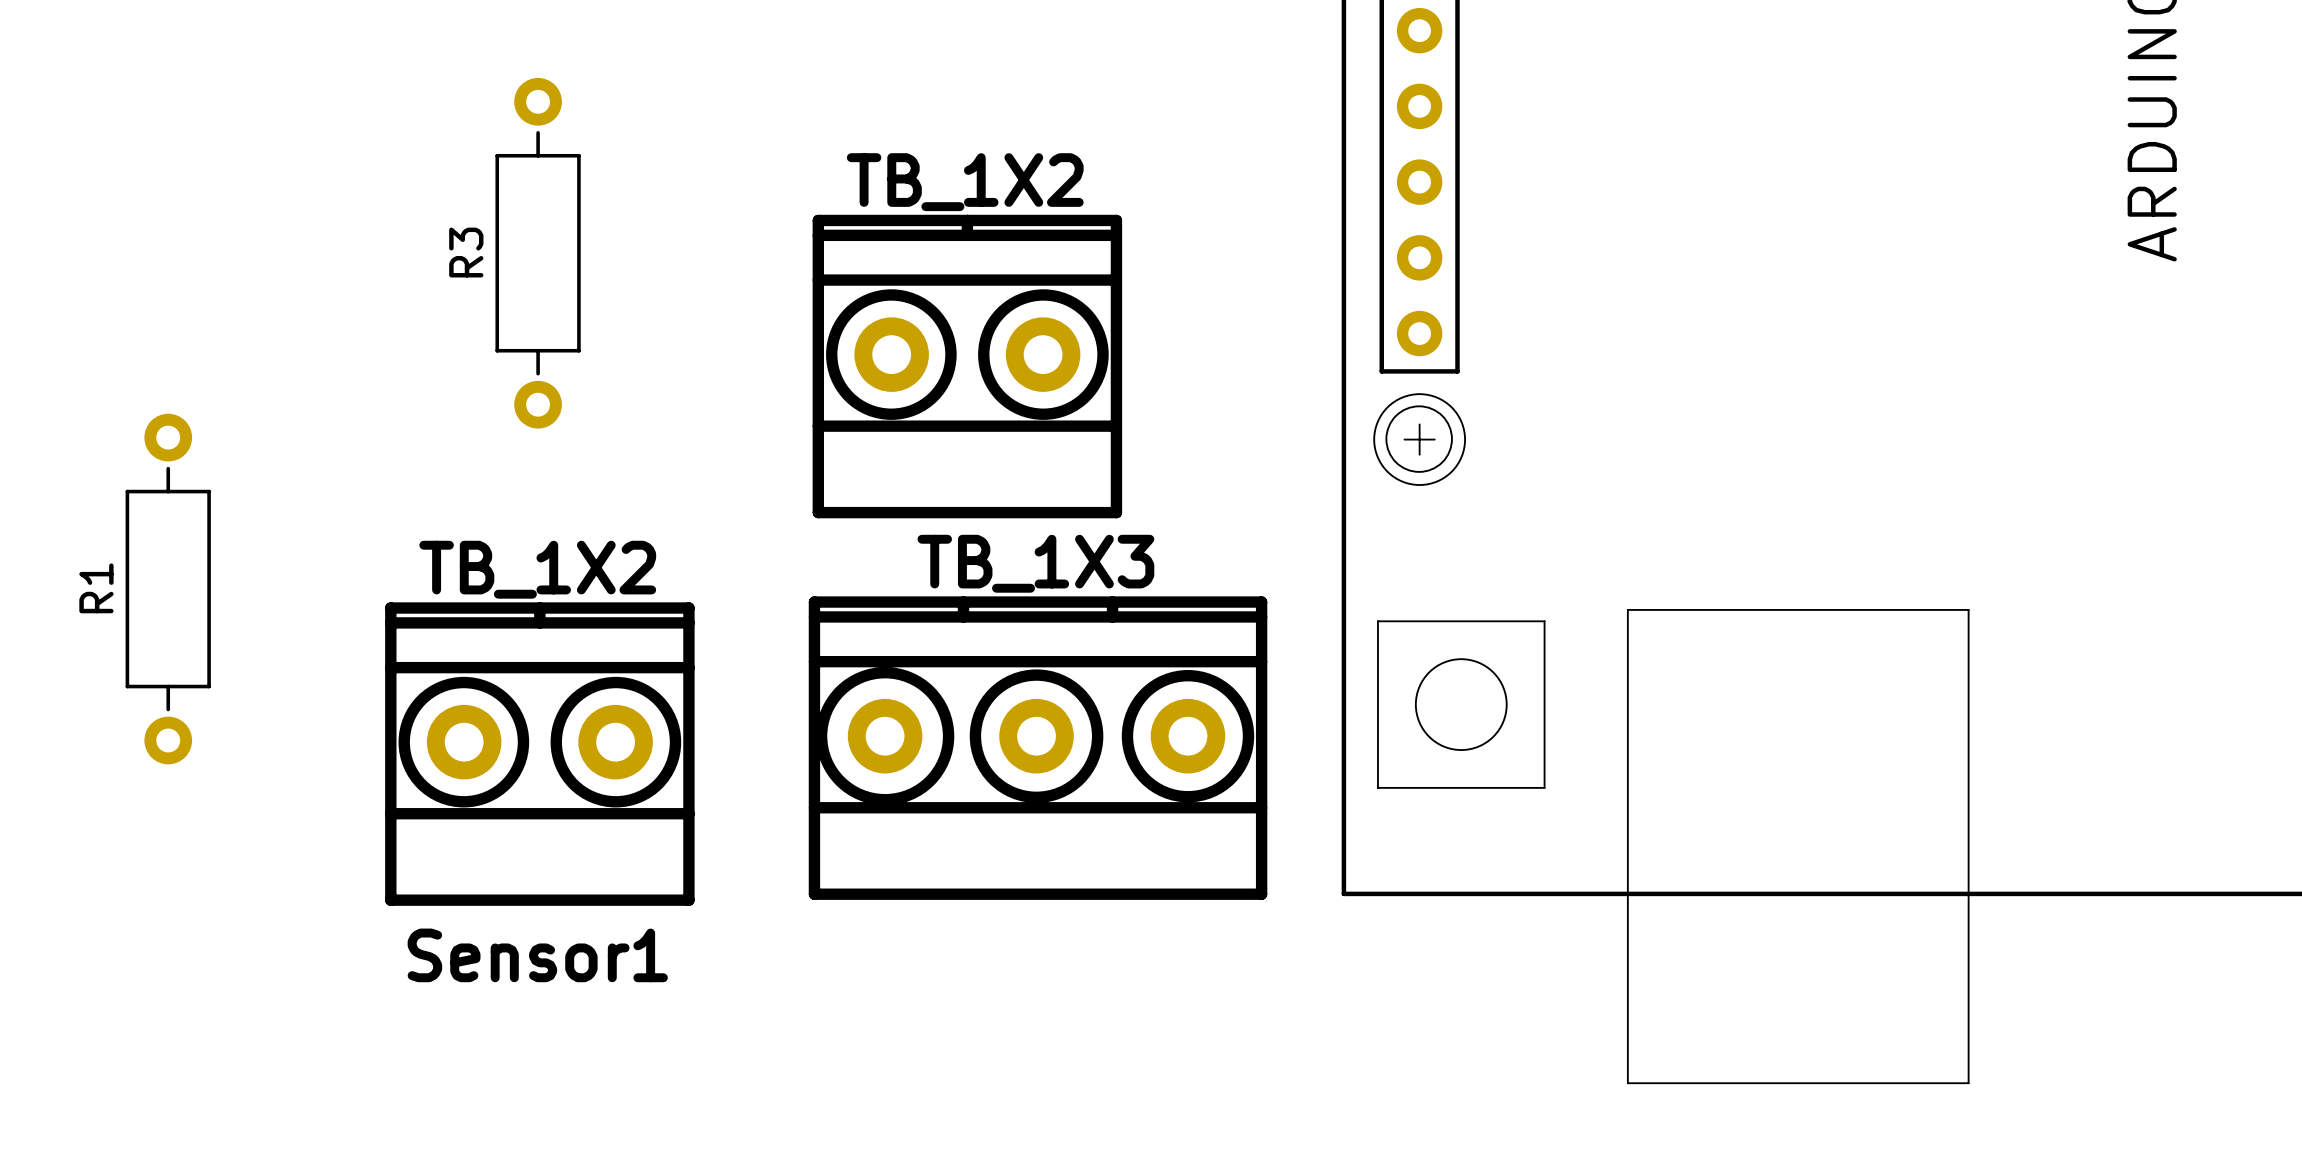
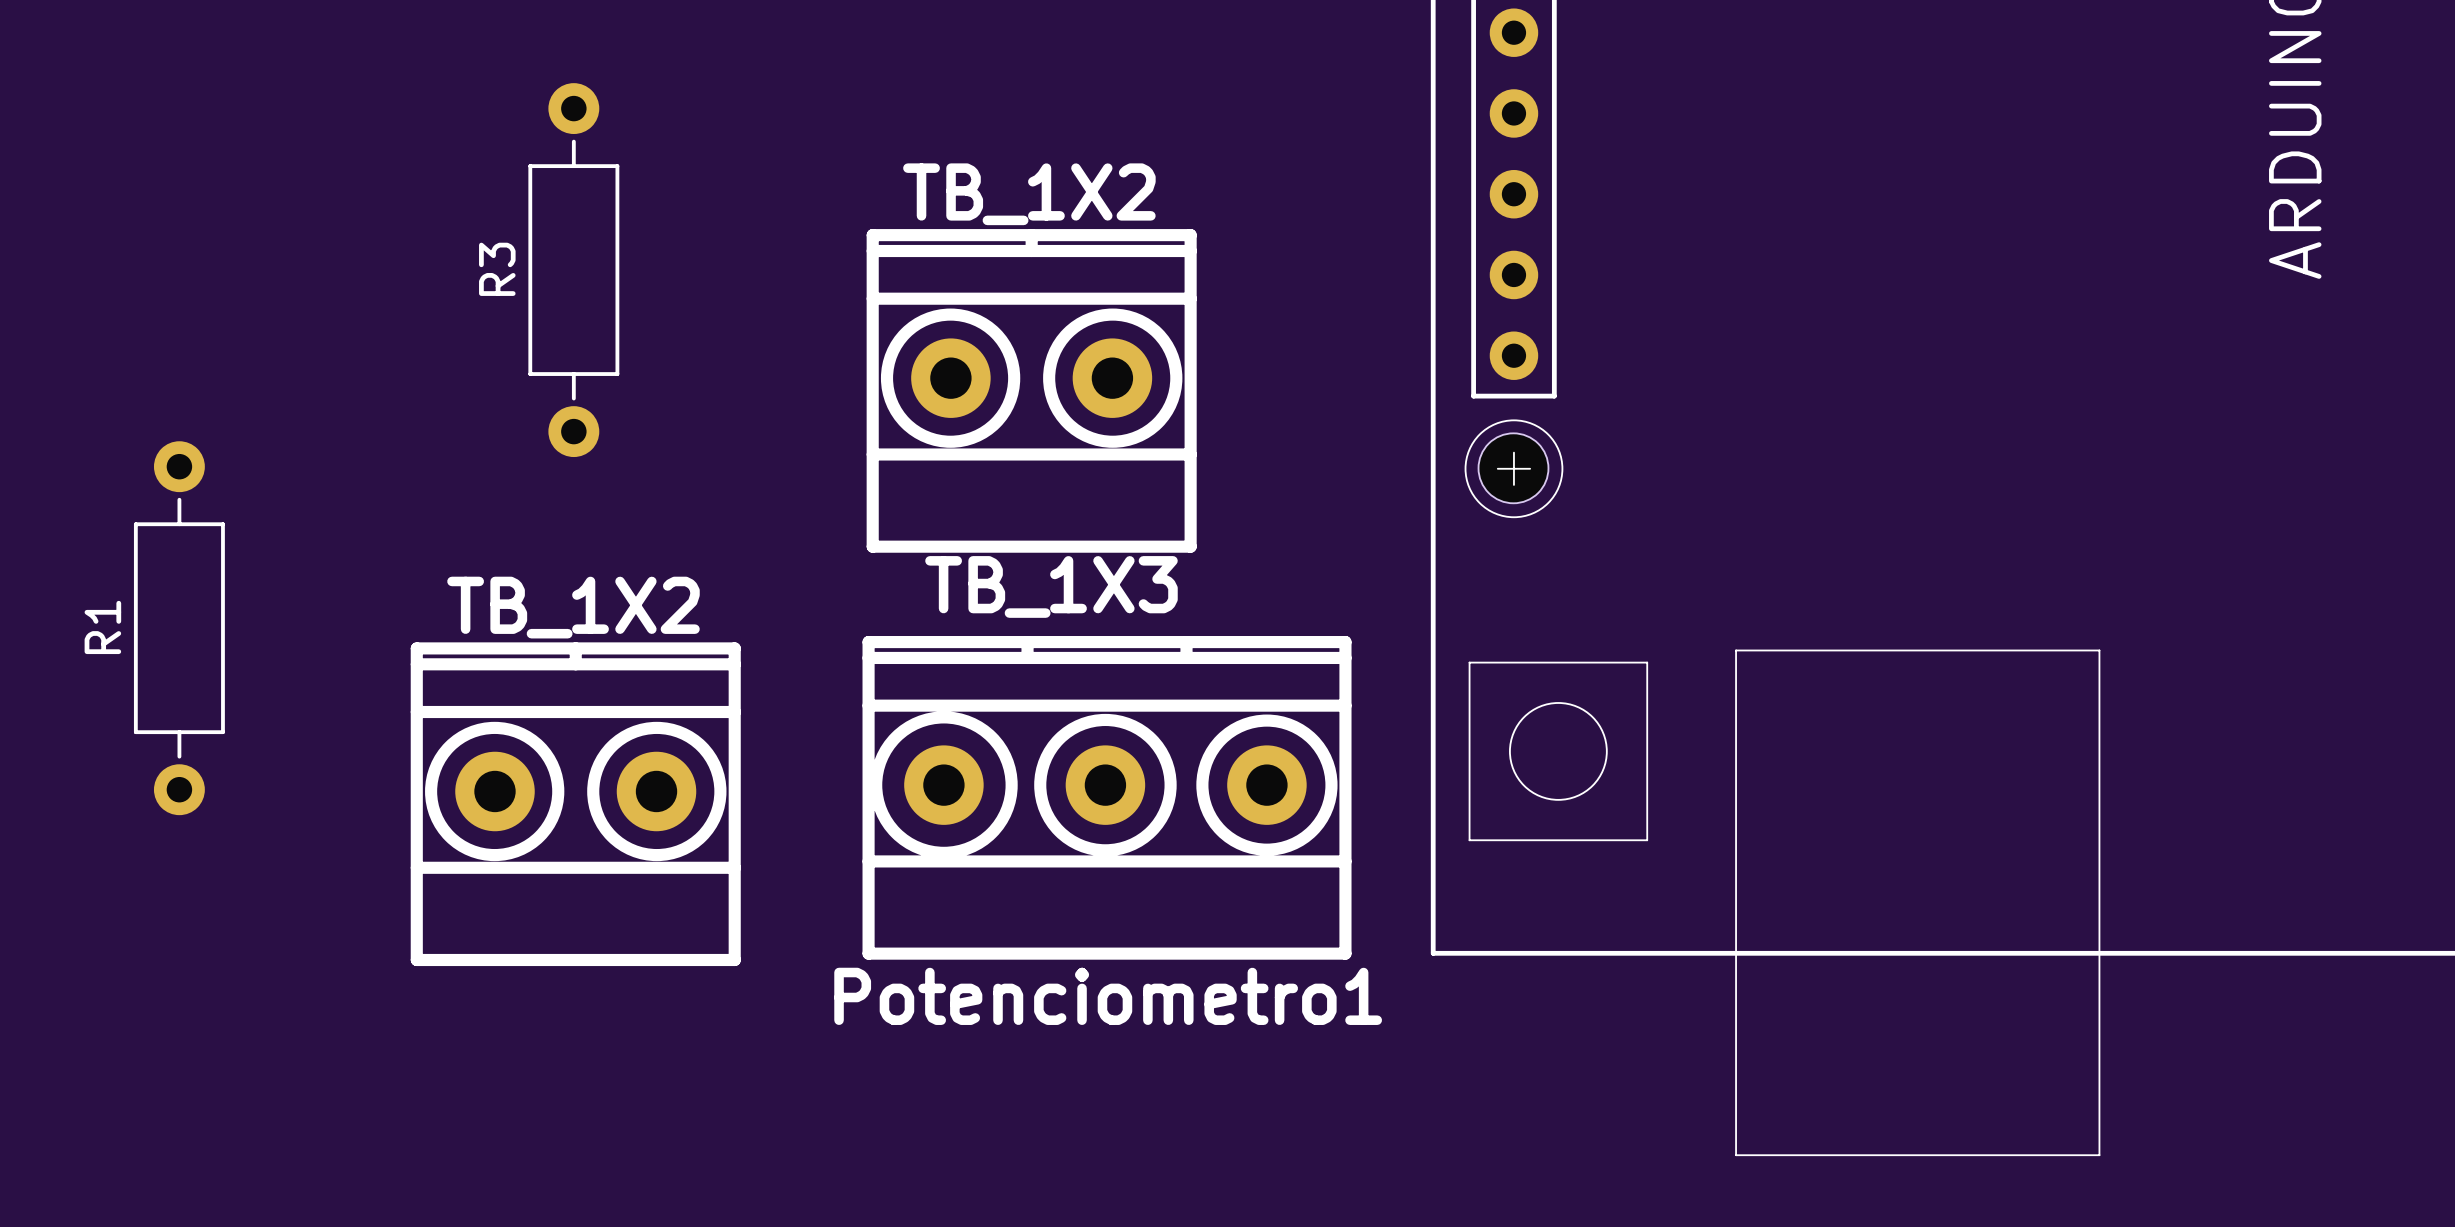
Sensor1 value position: TB_1X3 (1035, 563) -> TB_1X3 (1051, 586)
Sensor1 name: Sensor1 (537, 955) -> Potenciometro1 (1108, 996)

